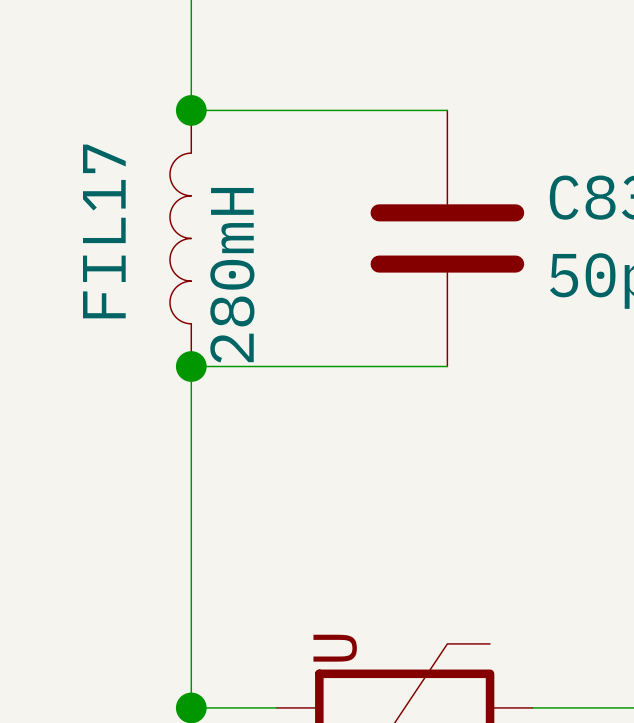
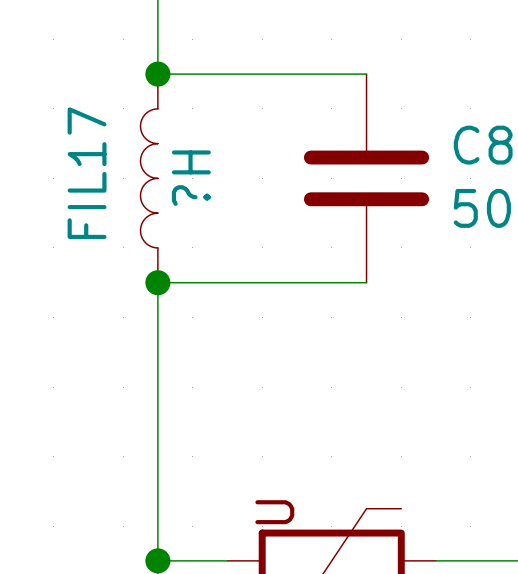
FIL17 value: 280mH (232, 275) -> ?H (191, 178)

